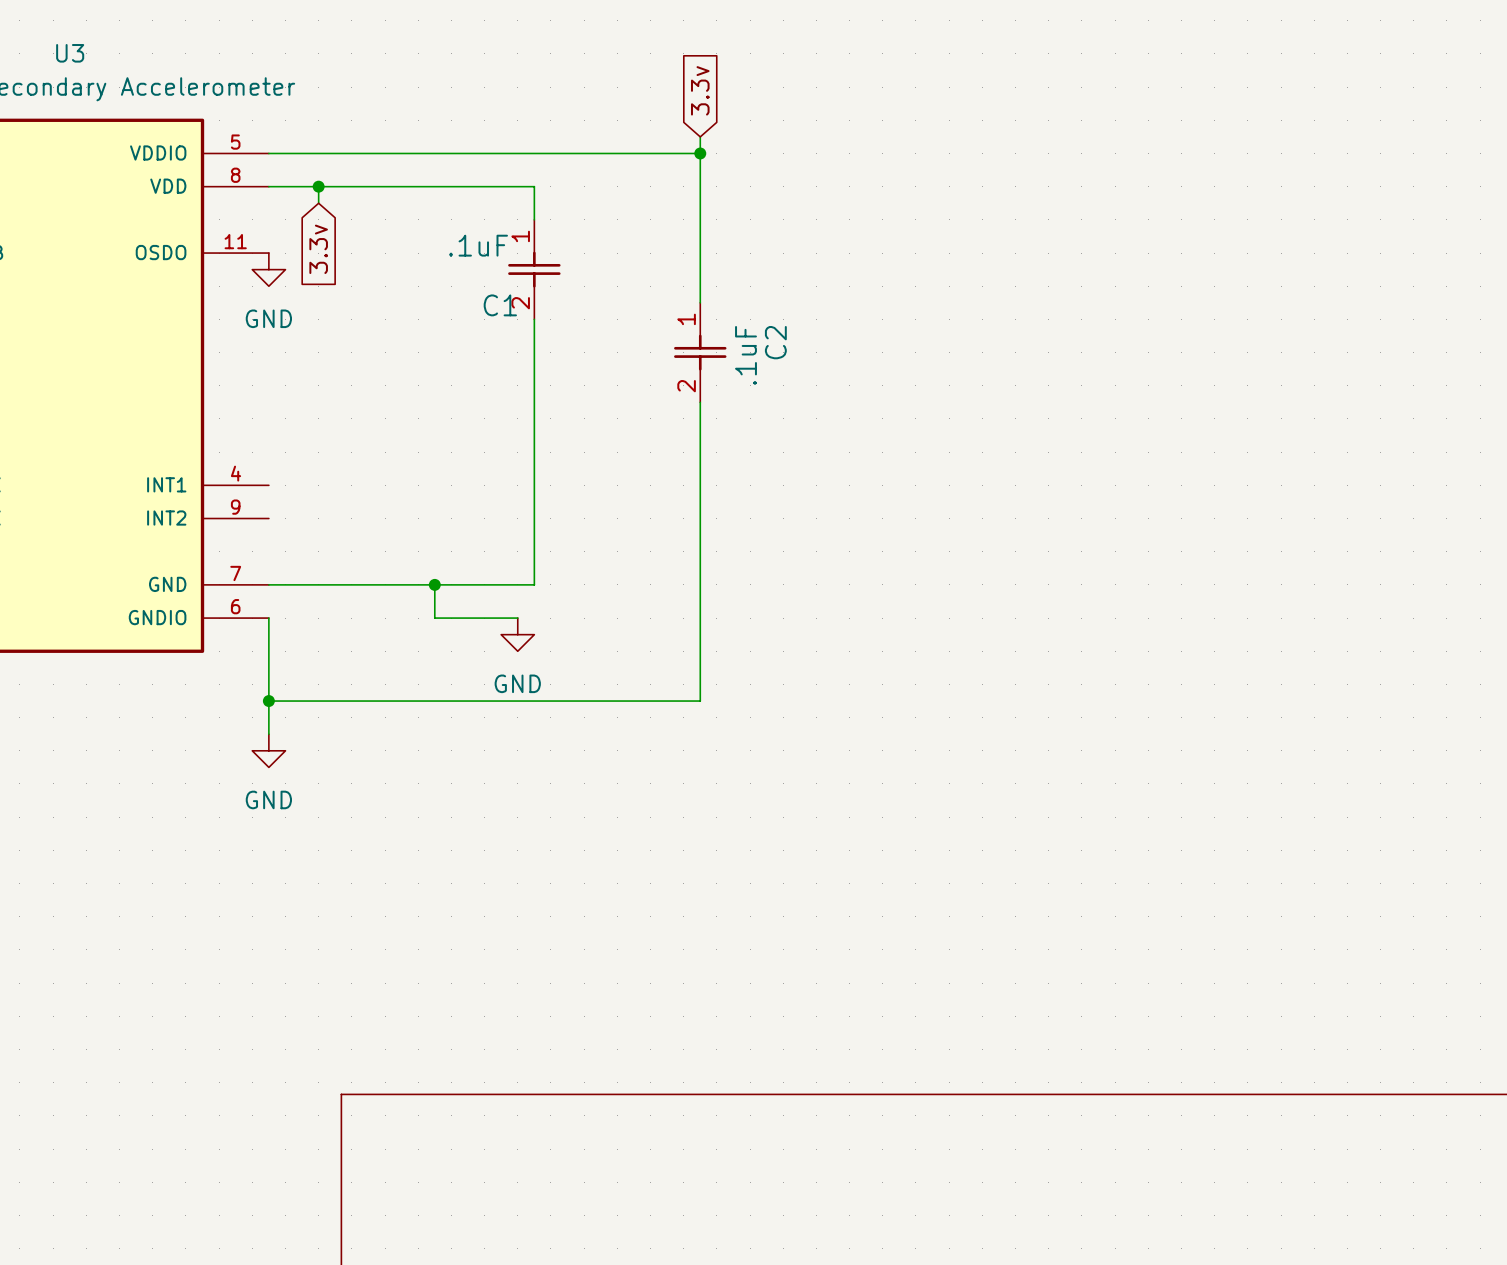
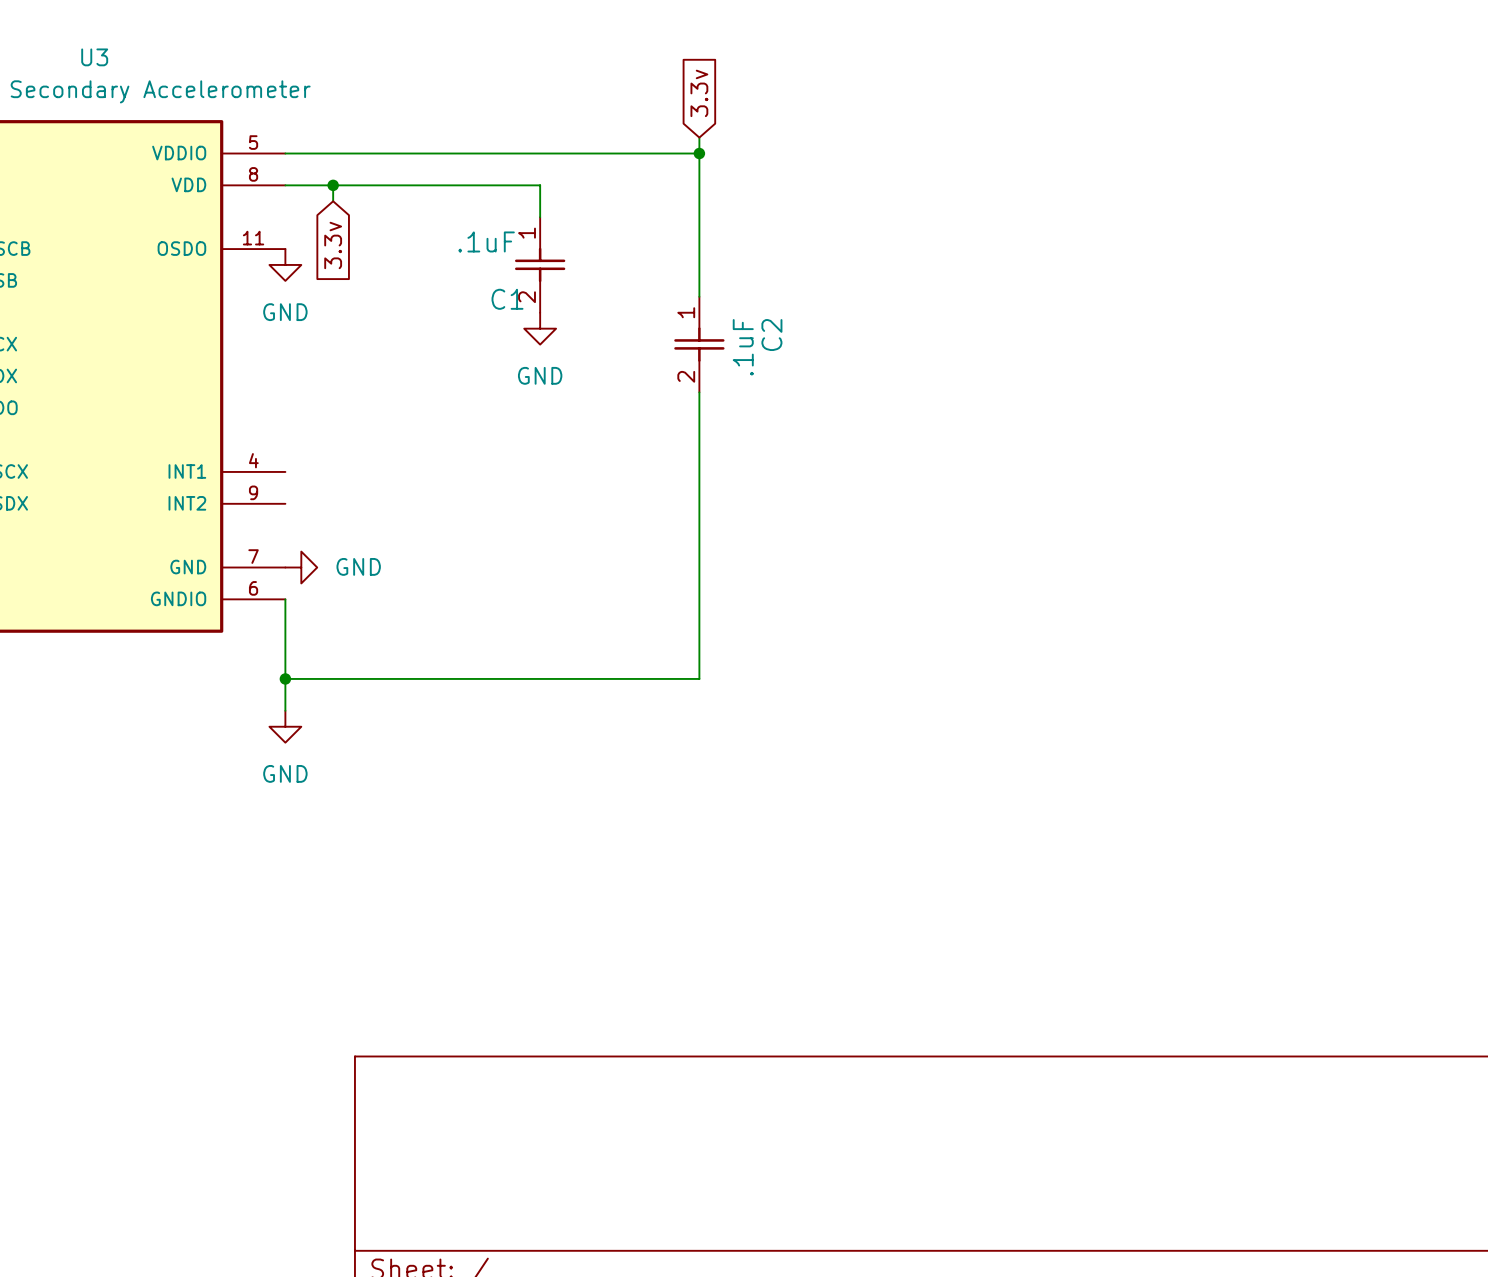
wire: (534, 319) (534, 584) (268, 584) -> none
power symbol: none -> GND (540, 328)
power symbol: none -> GND (301, 567)
wire: (434, 584) (434, 618) (517, 618) -> none
junction: (434, 584) -> none
power symbol: GND (517, 634) -> none

